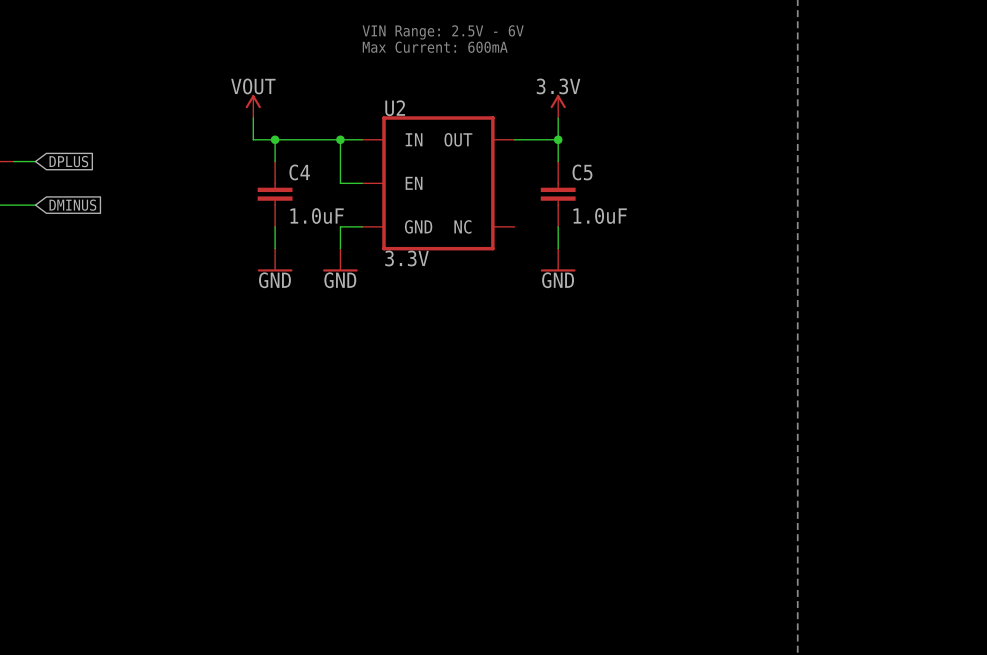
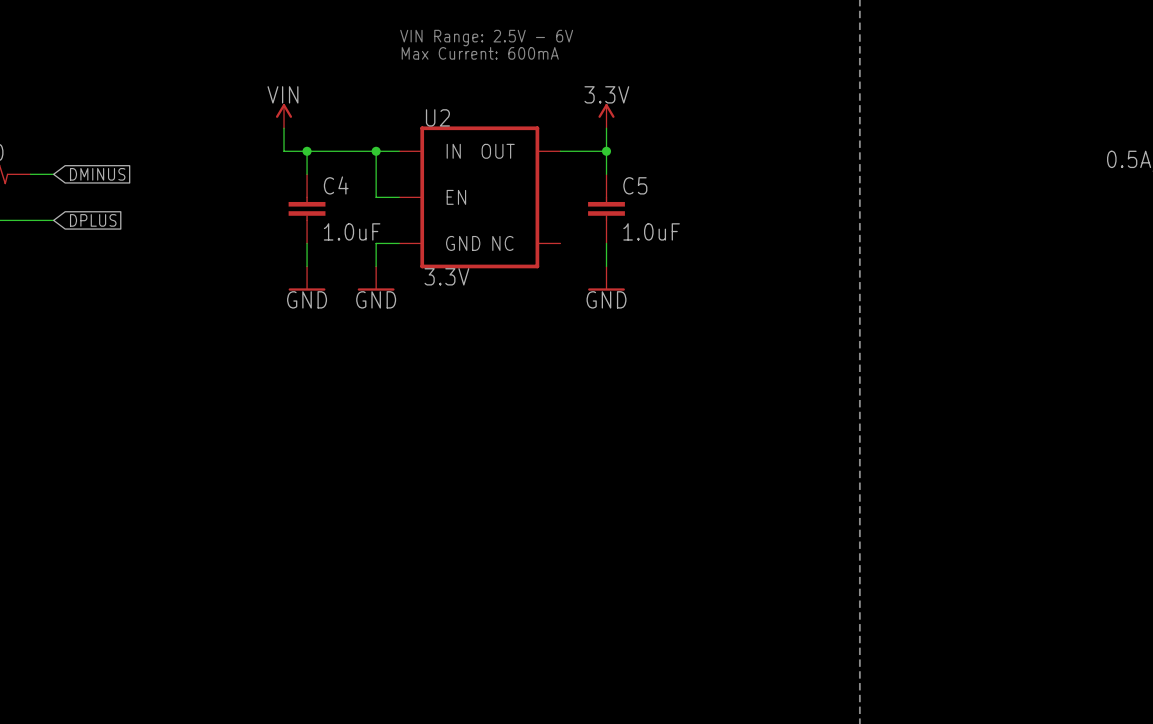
power symbol: VOUT (253, 106) -> VIN (284, 116)
global label: DPLUS (68, 161) -> DMINUS (97, 174)
global label: DMINUS (72, 205) -> DPLUS (93, 220)

